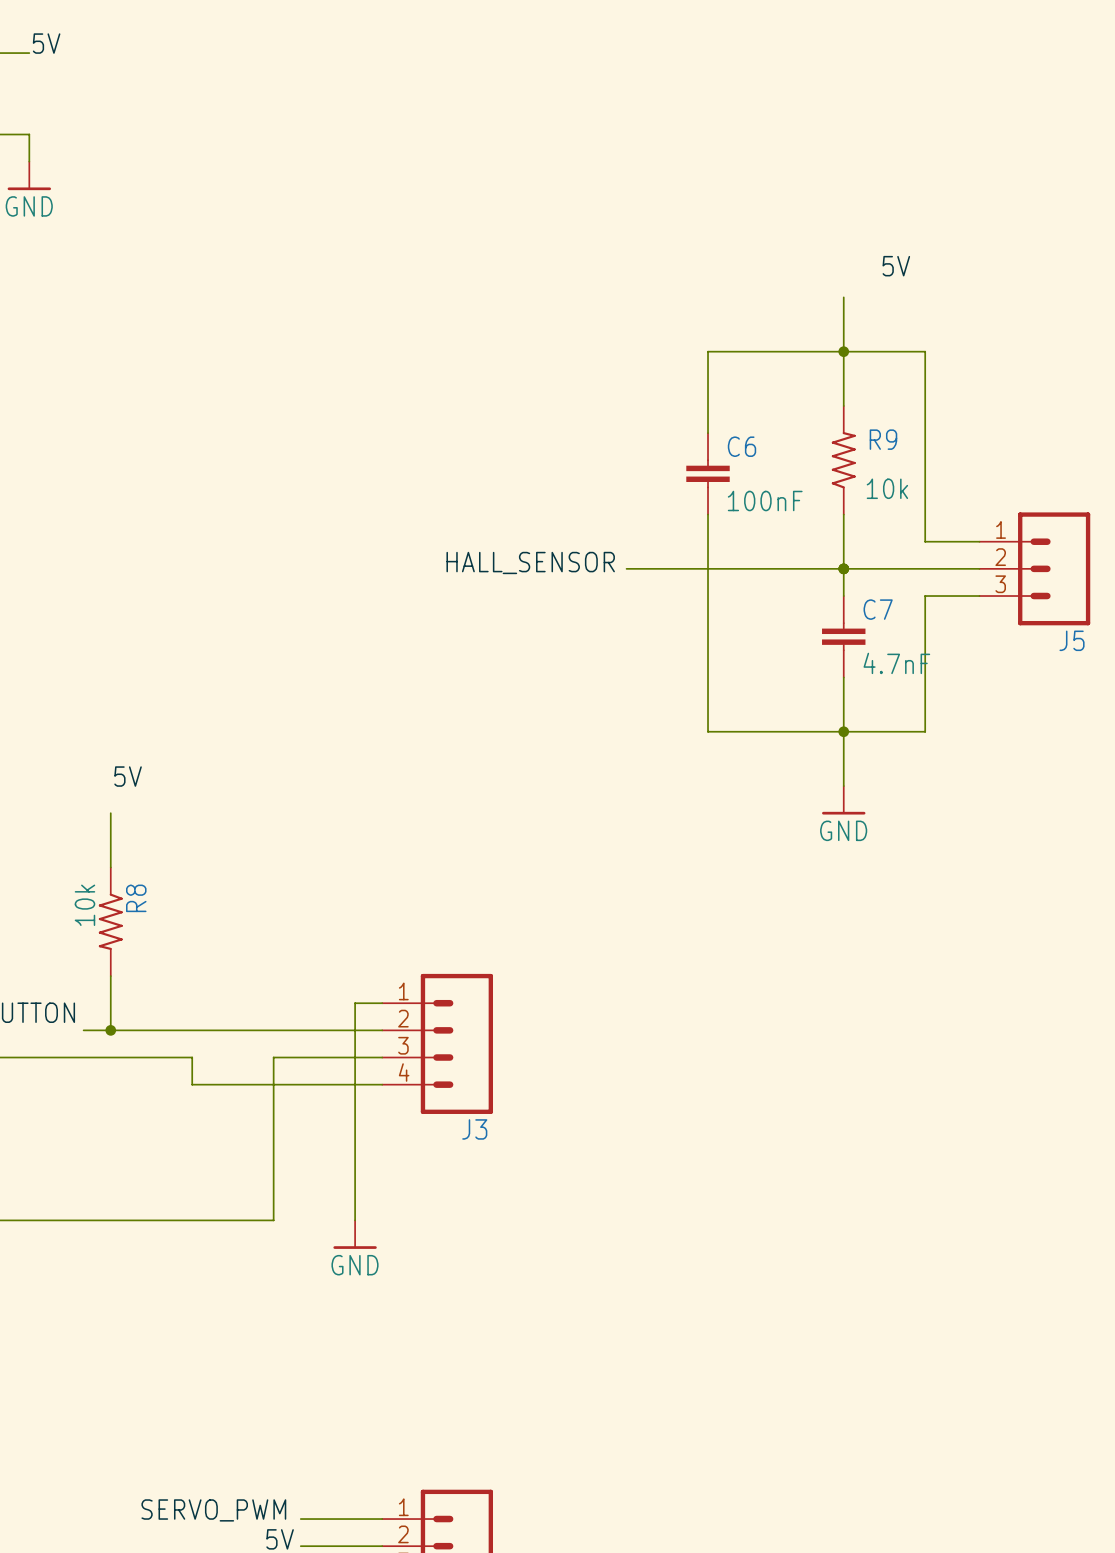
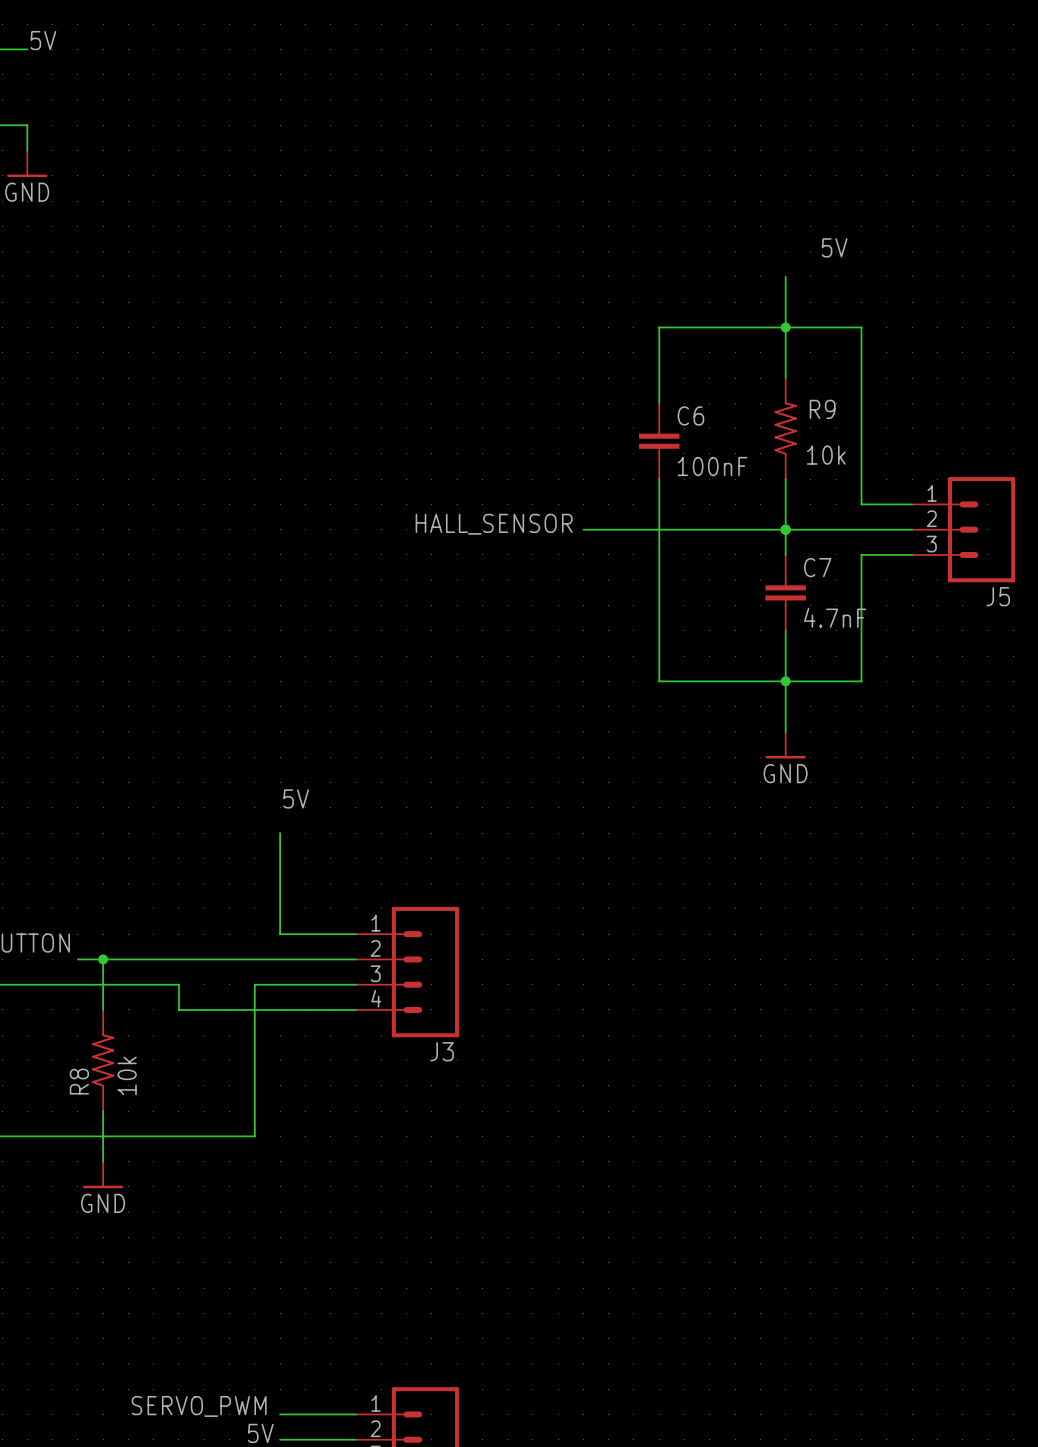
label position: 5V (128, 776) -> 5V (296, 798)
wire: (110, 813) (110, 867) -> none
R8 rotation: 0° (110, 921) -> 180° (103, 1060)
R8 position: (110, 921) -> (103, 1060)
wire: (110, 976) (110, 1030) -> (103, 1009) (103, 959)
wire: (355, 1003) (355, 1220) -> (330, 934) (280, 934) (280, 833)
wire: none -> (103, 1111) (103, 1161)
power symbol position: GND (355, 1234) -> GND (103, 1174)

